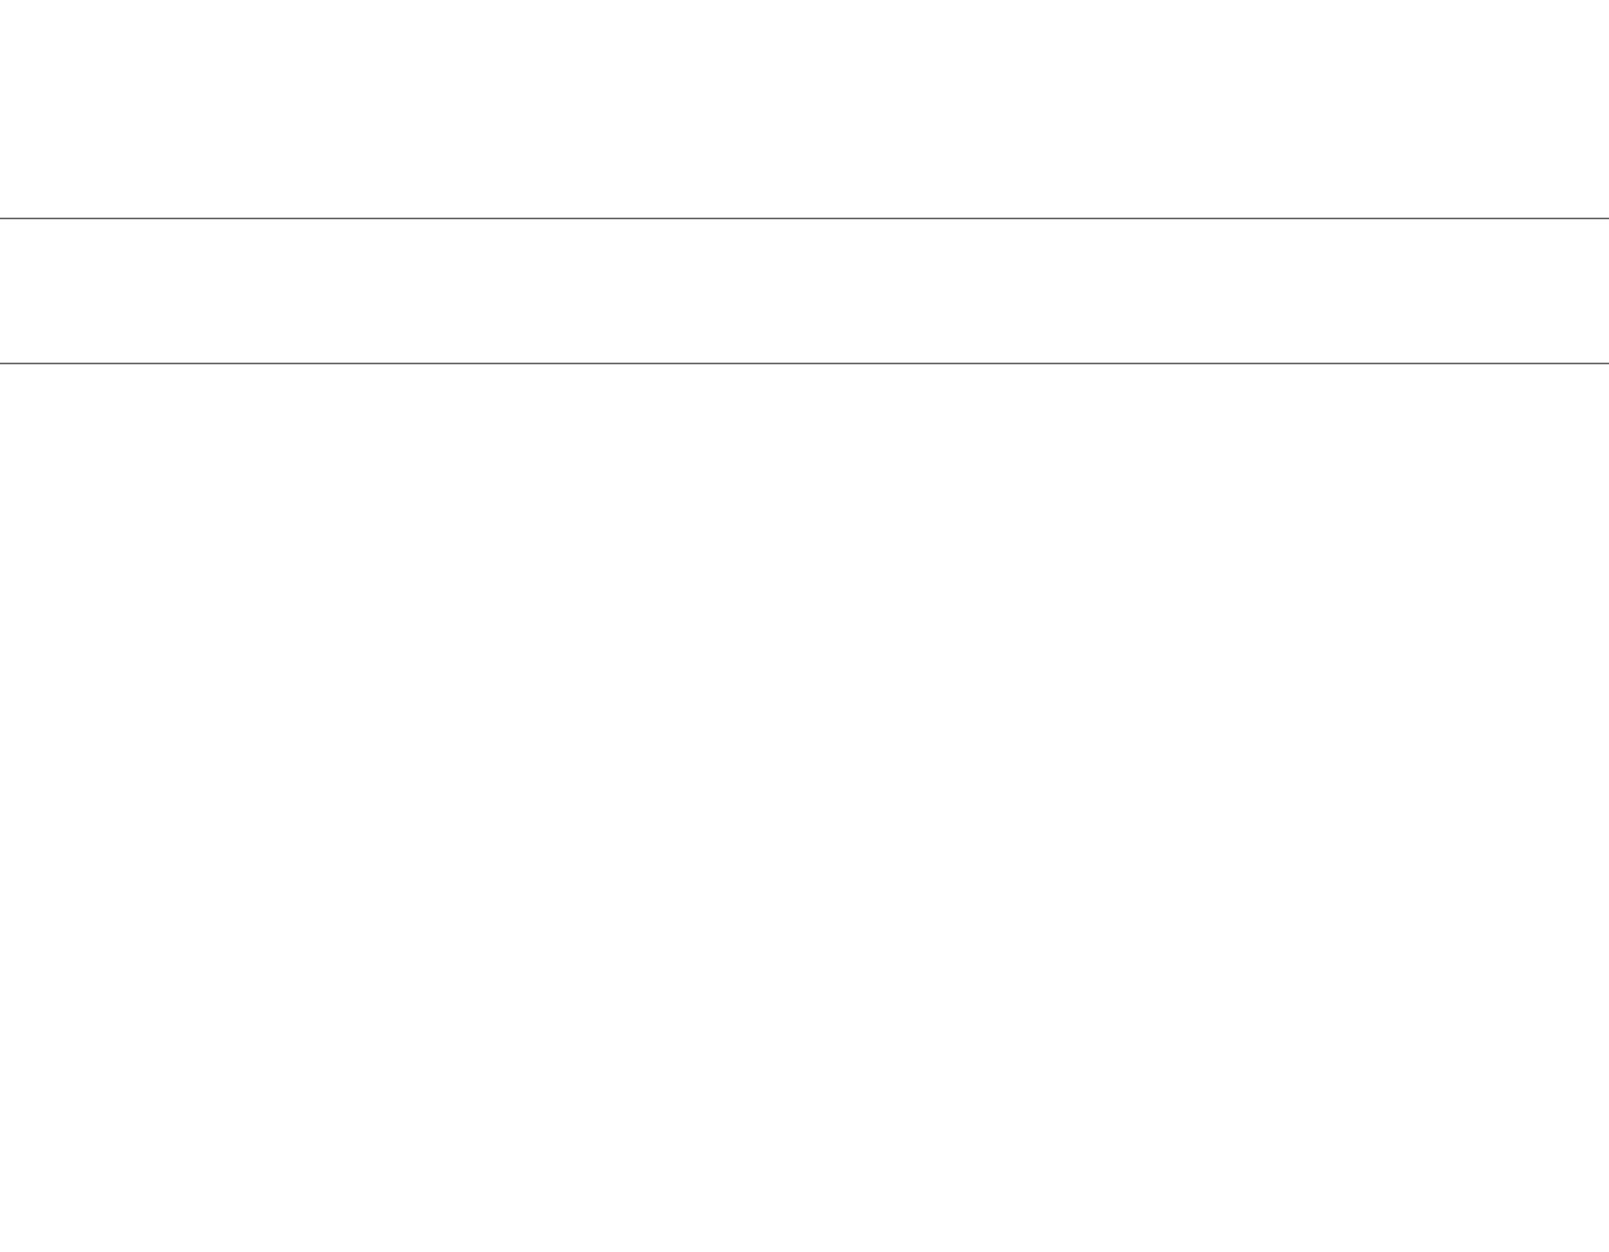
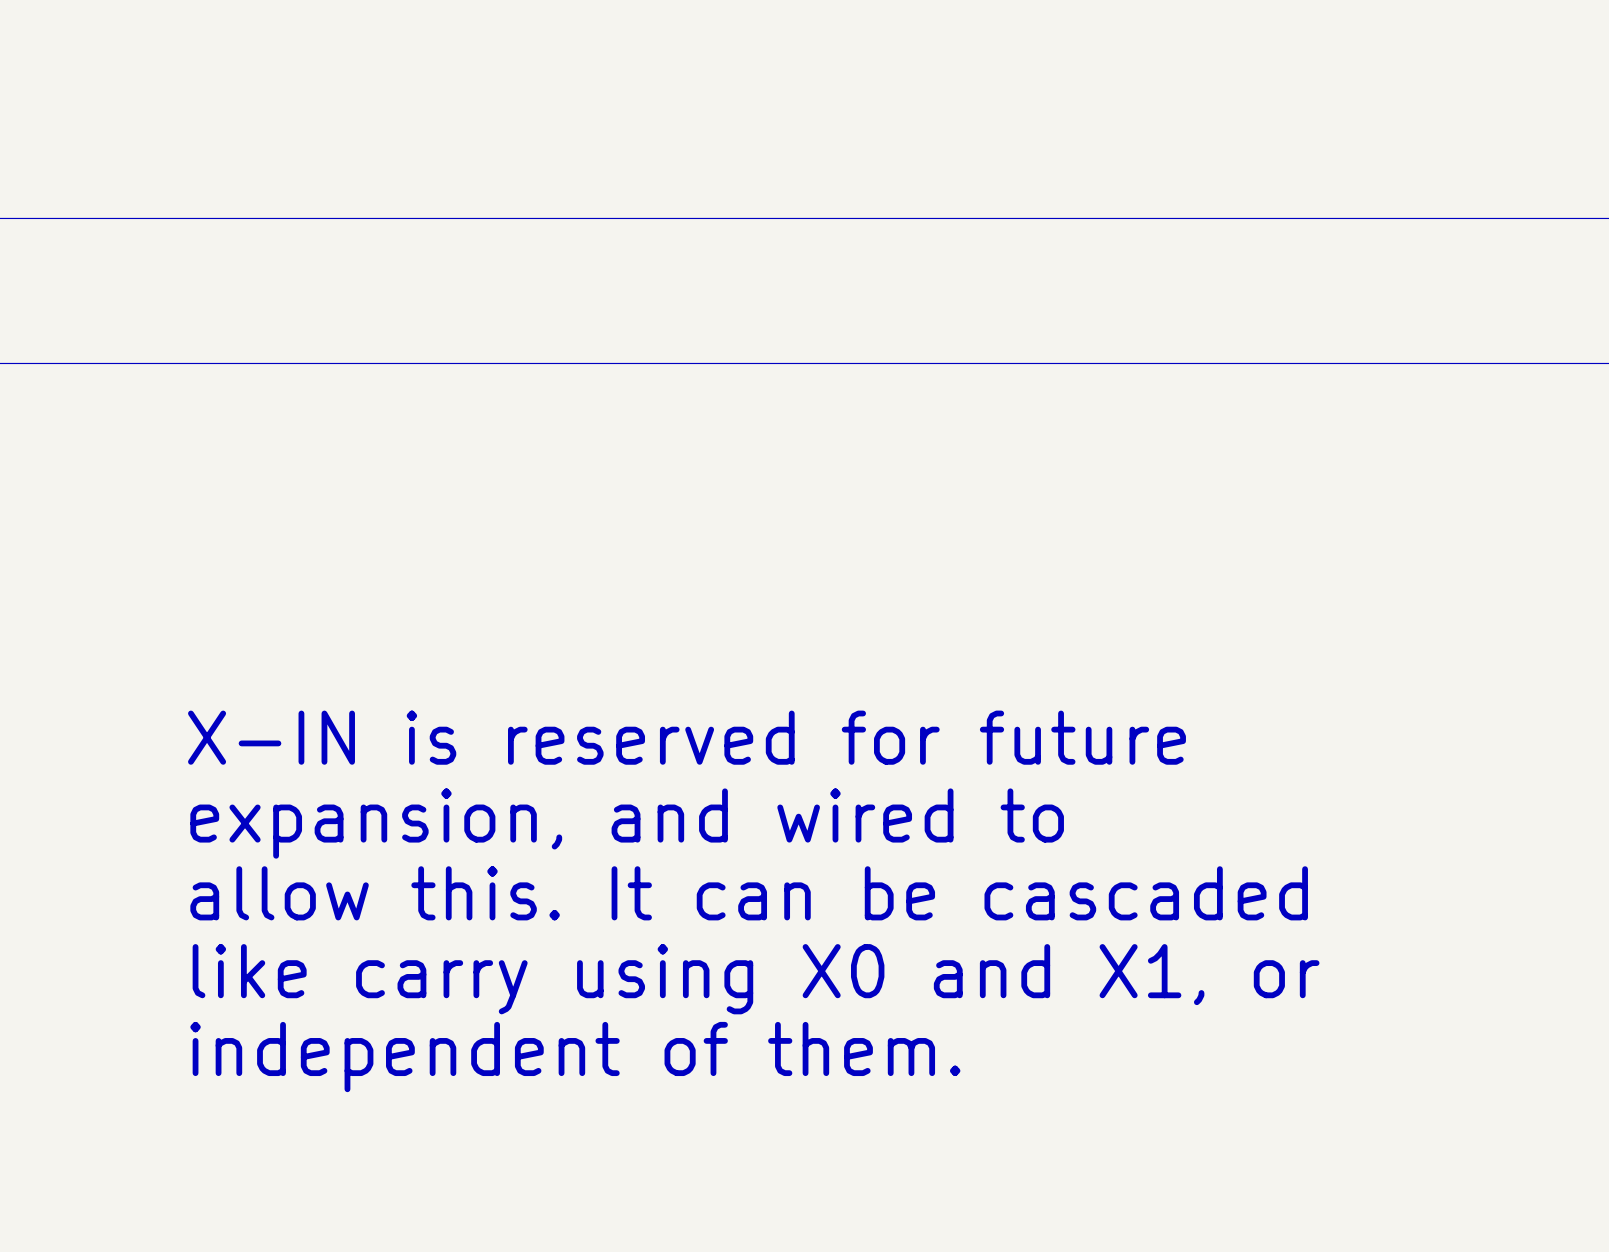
text: none -> X-IN is reserved for future (687, 737)
text: none -> expansion, and wired to (627, 823)
text: none -> allow this. It can be cascaded (749, 893)
text: none -> like carry using X0 and X1, or (756, 979)
text: none -> independent of them. (575, 1057)

